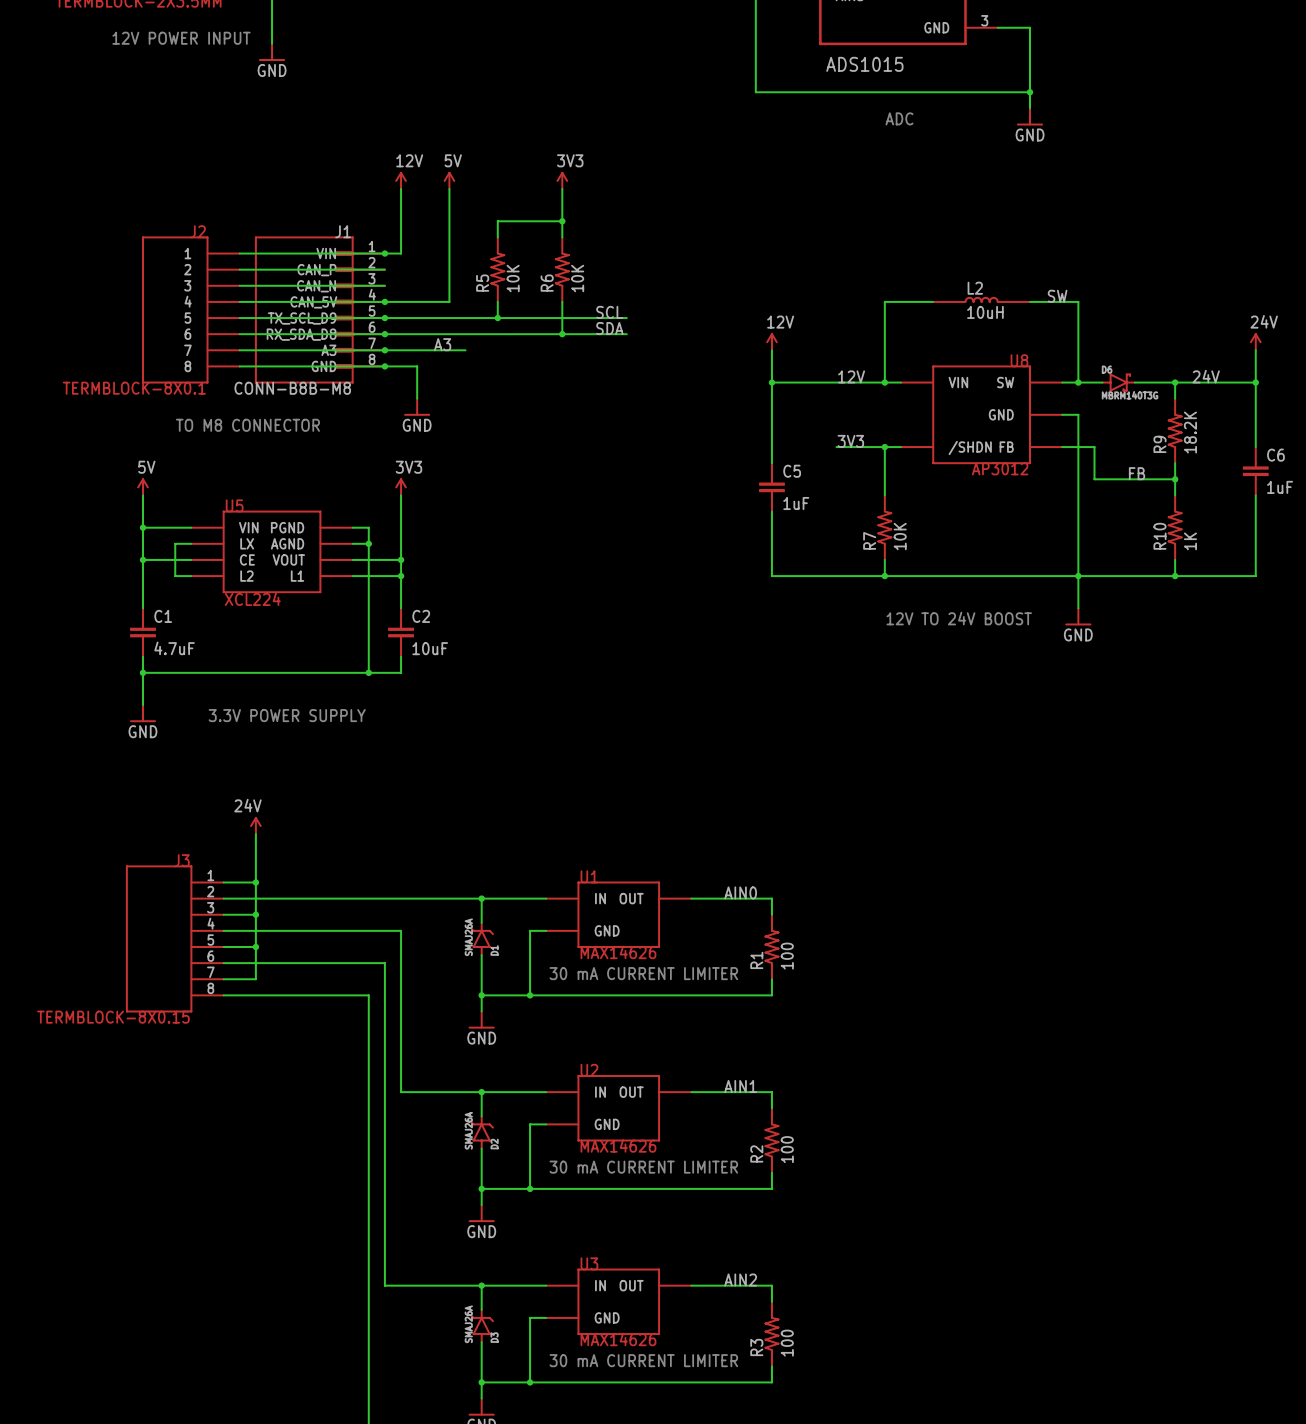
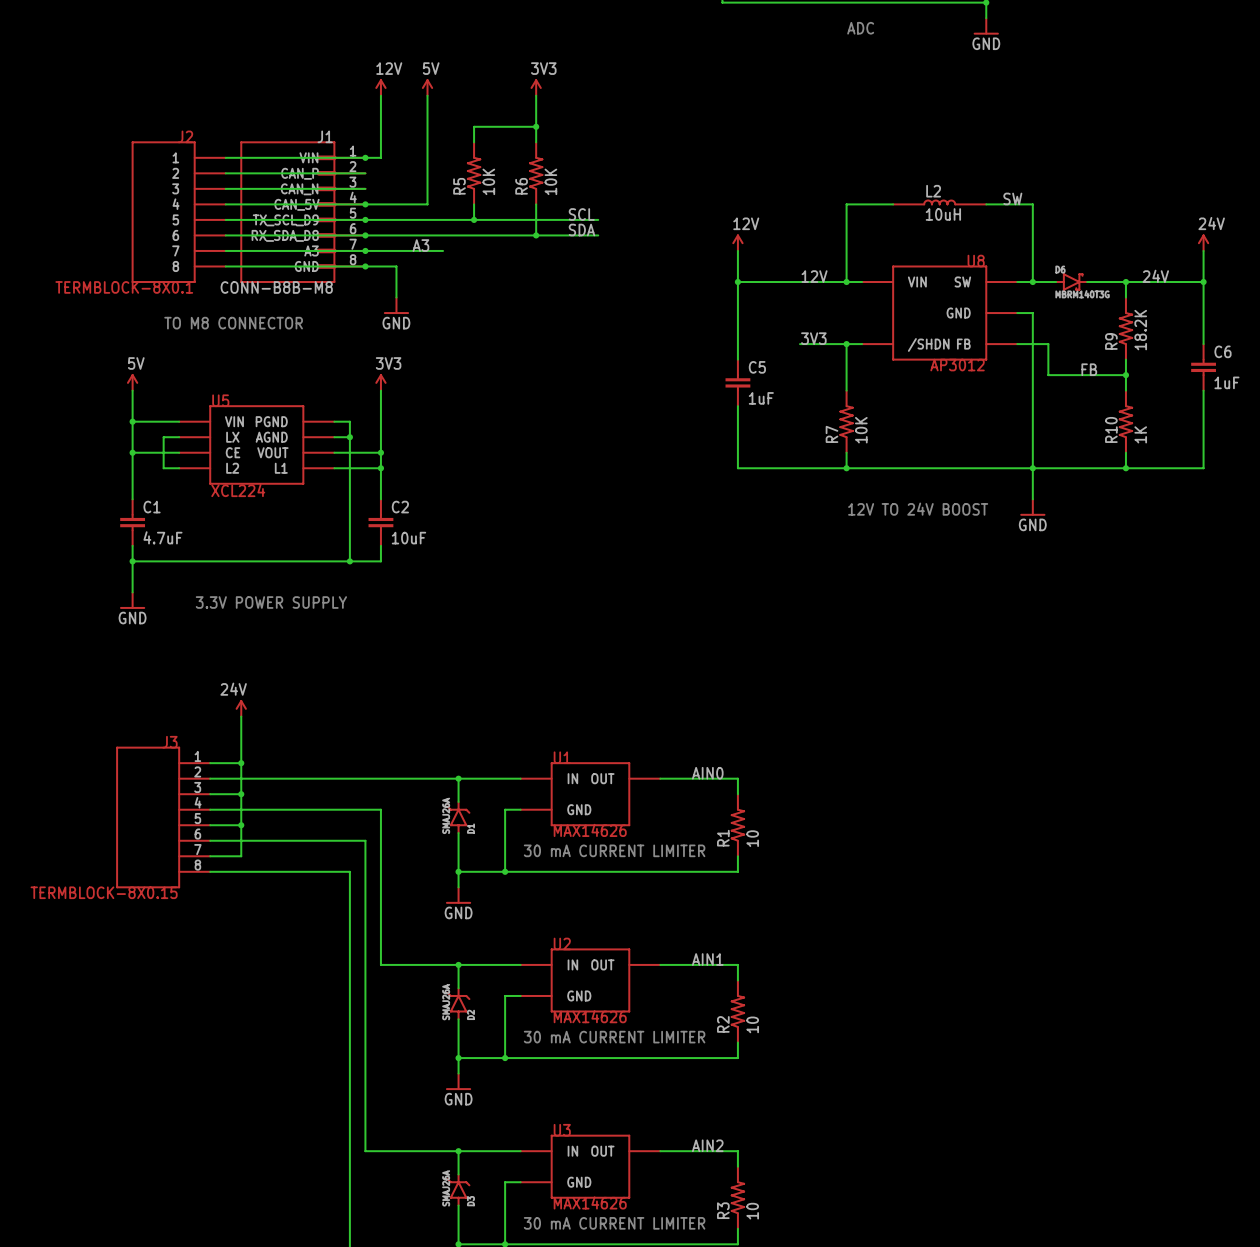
R1 value: 100 (787, 956) -> 10 (752, 838)
R2 value: 100 (787, 1149) -> 10 (752, 1024)
R3 value: 100 (787, 1343) -> 10 (752, 1211)

